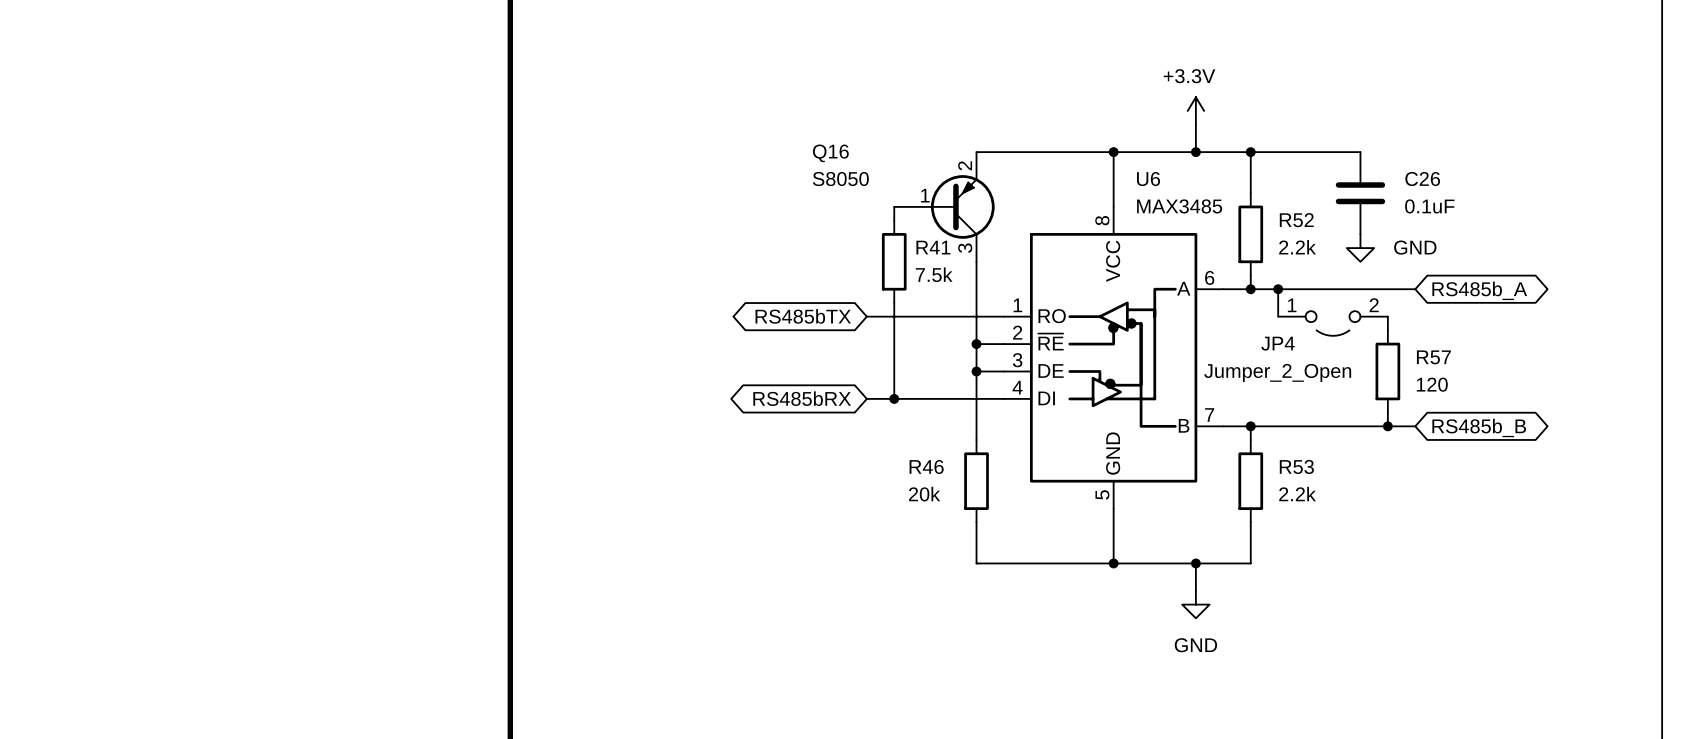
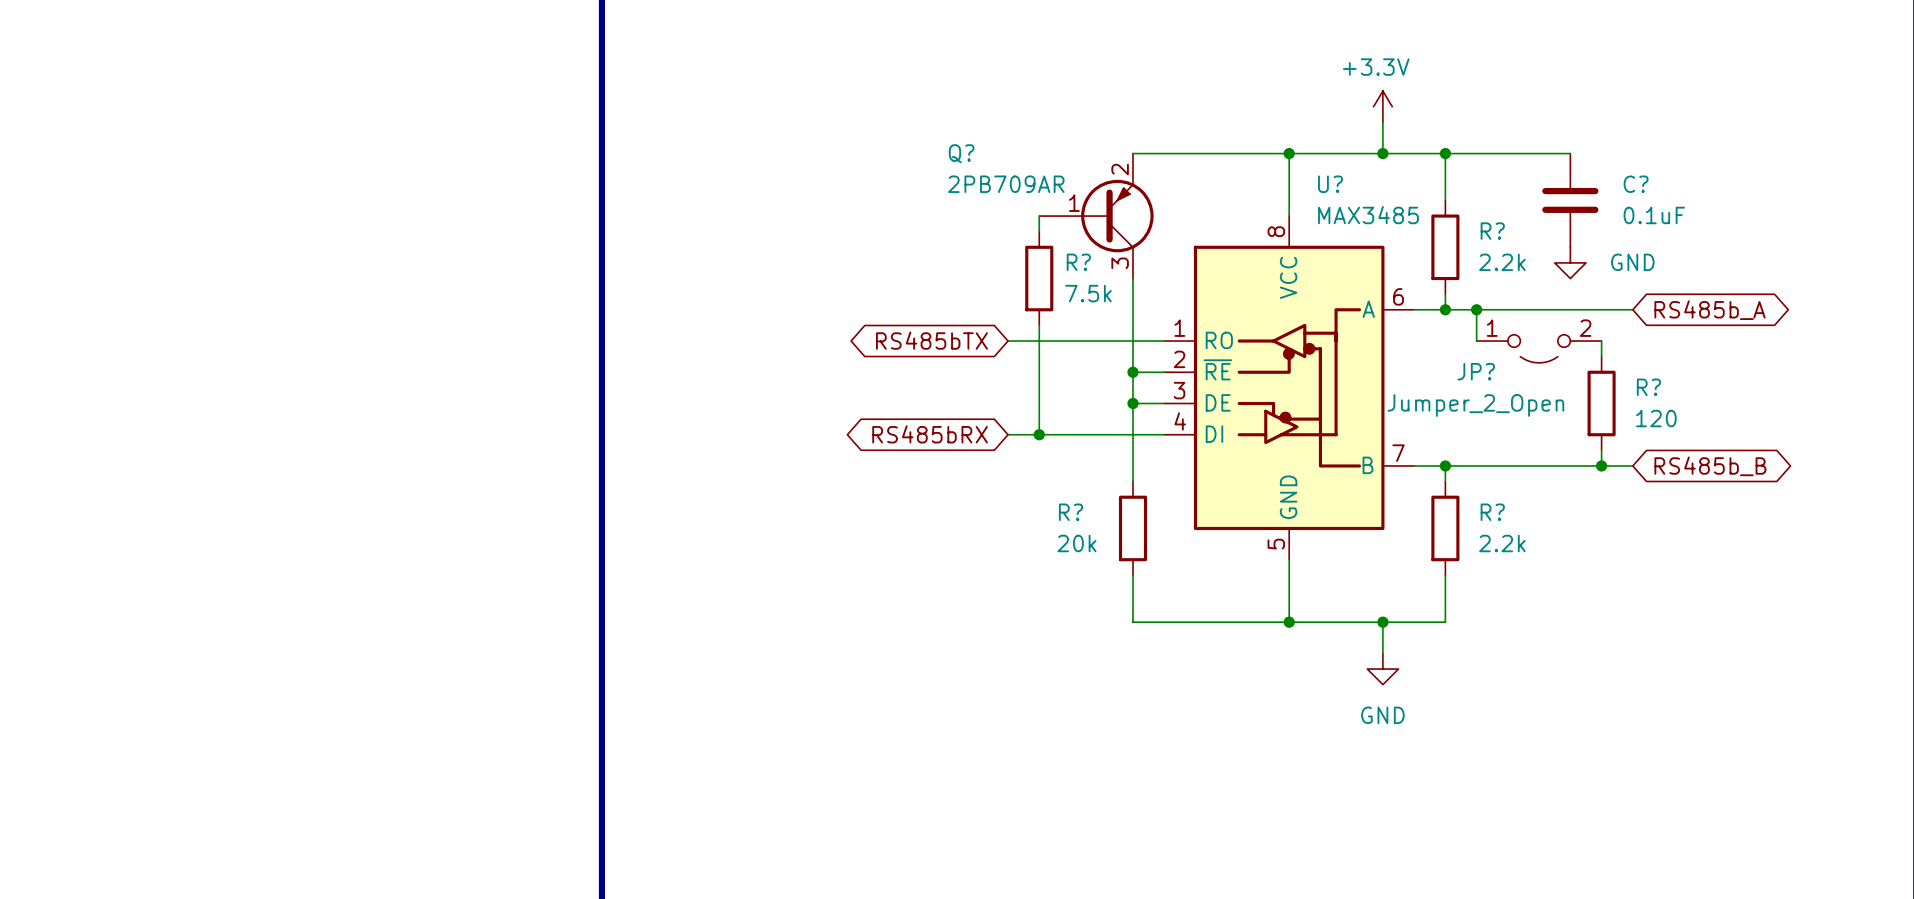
Q16 name: Q16 (830, 153) -> Q? (961, 153)
Q16 value: S8050 (840, 179) -> 2PB709AR (1006, 184)
U6 name: U6 (1148, 179) -> U? (1330, 184)
C26 name: C26 (1422, 179) -> C? (1636, 184)
R52 name: R52 (1296, 220) -> R? (1492, 231)
R41 name: R41 (933, 247) -> R? (1078, 262)
JP4 name: JP4 (1278, 343) -> JP? (1476, 371)
R57 name: R57 (1433, 357) -> R? (1648, 387)
R46 name: R46 (926, 466) -> R? (1071, 512)
R53 name: R53 (1296, 466) -> R? (1492, 512)

